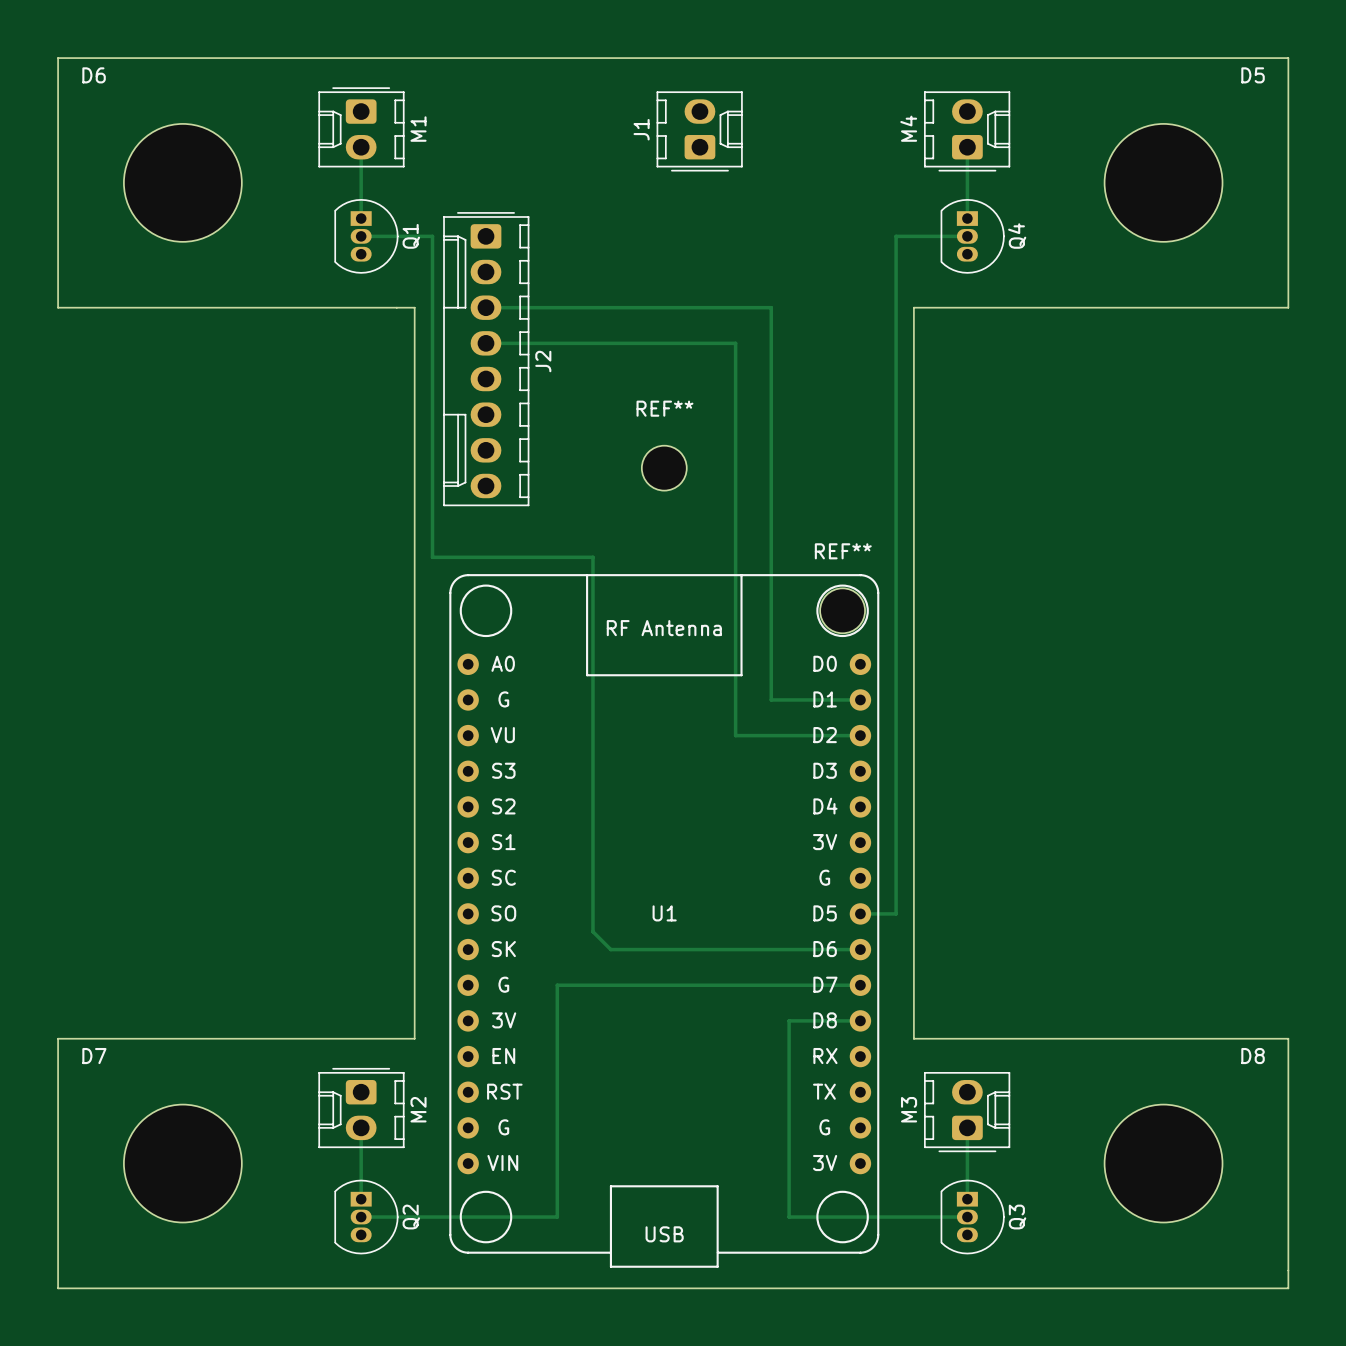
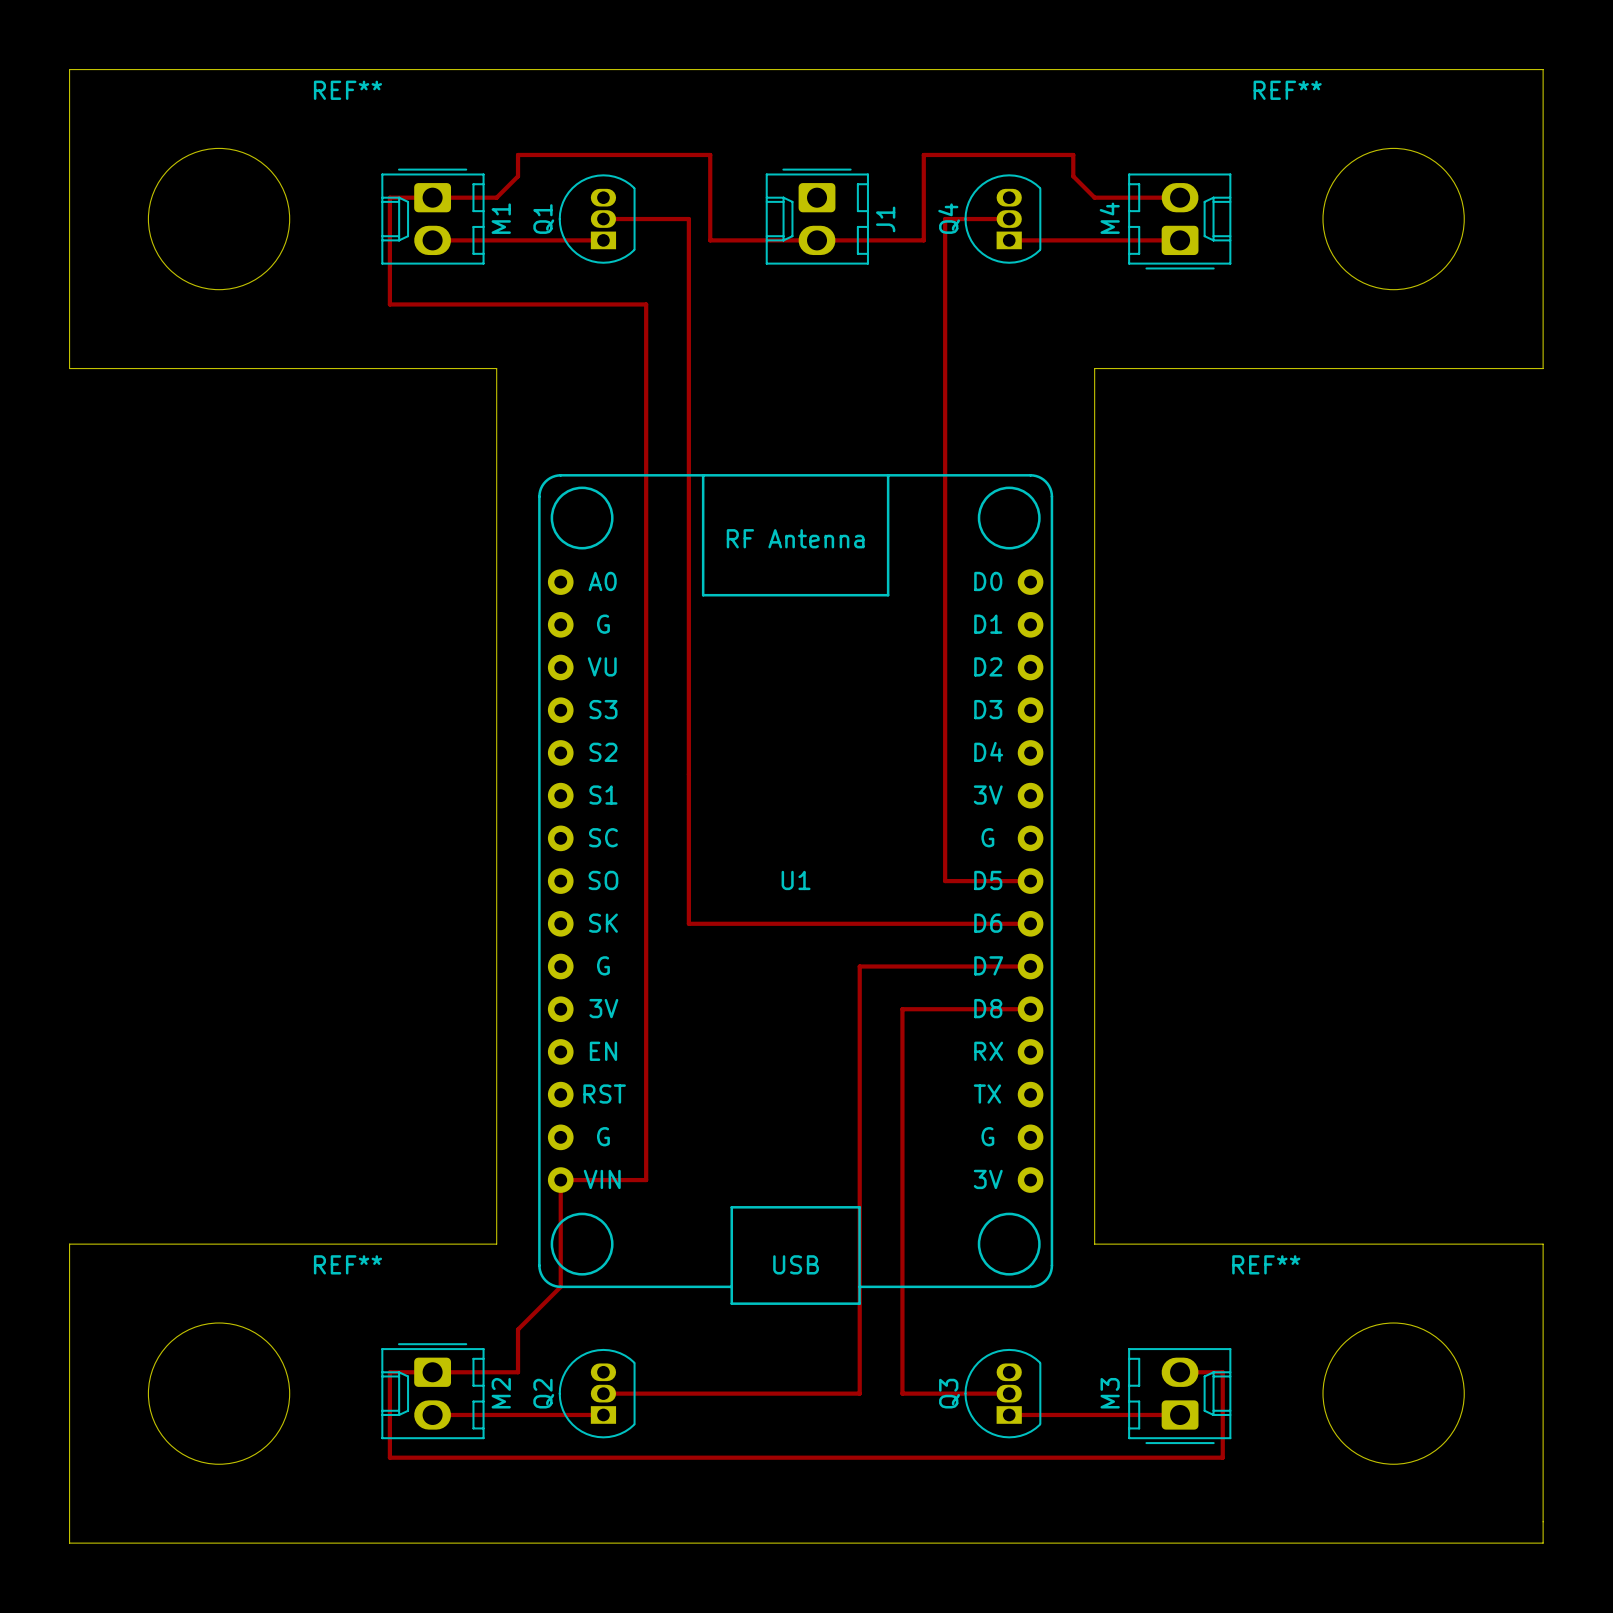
D6 name: D6 (94, 75) -> REF** (347, 90)
D5 name: D5 (1253, 75) -> REF** (1287, 90)
M1 position: (361, 127) -> (432, 216)
J1 rotation: 0° (699, 131) -> 180° (817, 216)
J1 position: (699, 131) -> (817, 216)
M4 position: (967, 131) -> (1179, 221)
track: (361, 147) (361, 218) -> none
track: (967, 147) (967, 218) -> none
track: none -> (1180, 197) (1094, 197) (1073, 176) (1073, 154) (923, 154) (923, 240) (710, 240) (710, 154) (518, 154) (518, 176) (496, 197) (389, 197) (389, 304) (646, 304) (646, 1180) (560, 1180) (560, 1286) (518, 1329) (518, 1372) (389, 1372) (389, 1457) (432, 1457)
track: none -> (603, 219) (688, 219) (688, 923) (1030, 923)
track: none -> (432, 240) (603, 240)
track: none -> (1009, 240) (1180, 240)
track: (361, 236) (432, 236) (432, 557) (592, 557) (592, 931) (610, 949) (860, 949) -> none
Q1 rotation: 0° (366, 236) -> 180° (597, 219)
Q1 position: (366, 236) -> (597, 219)
track: (967, 236) (896, 236) (896, 913) (860, 913) -> none
Q4 rotation: 0° (972, 236) -> 180° (1002, 219)
Q4 position: (972, 236) -> (1002, 219)
track: (485, 307) (771, 307) (771, 699) (860, 699) -> none
track: (485, 343) (735, 343) (735, 735) (789, 735) -> (1009, 219) (945, 219) (945, 881)
J2: (486, 359) -> none
REF**: (664, 468) -> none
REF**: (842, 610) -> none
track: none -> (1030, 966) (859, 966) (859, 1393) (603, 1393)
track: none -> (1030, 1009) (902, 1009) (902, 1393) (1009, 1393)
U1 position: (664, 920) -> (795, 889)
track: (860, 985) (557, 985) (557, 1217) -> (945, 1457) (667, 1457)
track: (860, 1020) (789, 1020) (789, 1217) -> none
D7 name: D7 (94, 1056) -> REF** (347, 1264)
D8 name: D8 (1253, 1056) -> REF** (1266, 1264)
M2 position: (361, 1108) -> (432, 1391)
M3 position: (967, 1112) -> (1179, 1396)
track: (361, 1127) (361, 1199) -> none
track: (967, 1127) (967, 1199) -> none
track: none -> (1180, 1372) (1222, 1372) (1222, 1457) (1158, 1457)
track: none -> (432, 1414) (603, 1414)
track: none -> (1009, 1414) (1180, 1414)
Q2 rotation: 0° (366, 1217) -> 180° (597, 1393)
Q2 position: (366, 1217) -> (597, 1393)
Q3 rotation: 0° (972, 1217) -> 180° (1002, 1393)
Q3 position: (972, 1217) -> (1002, 1393)

